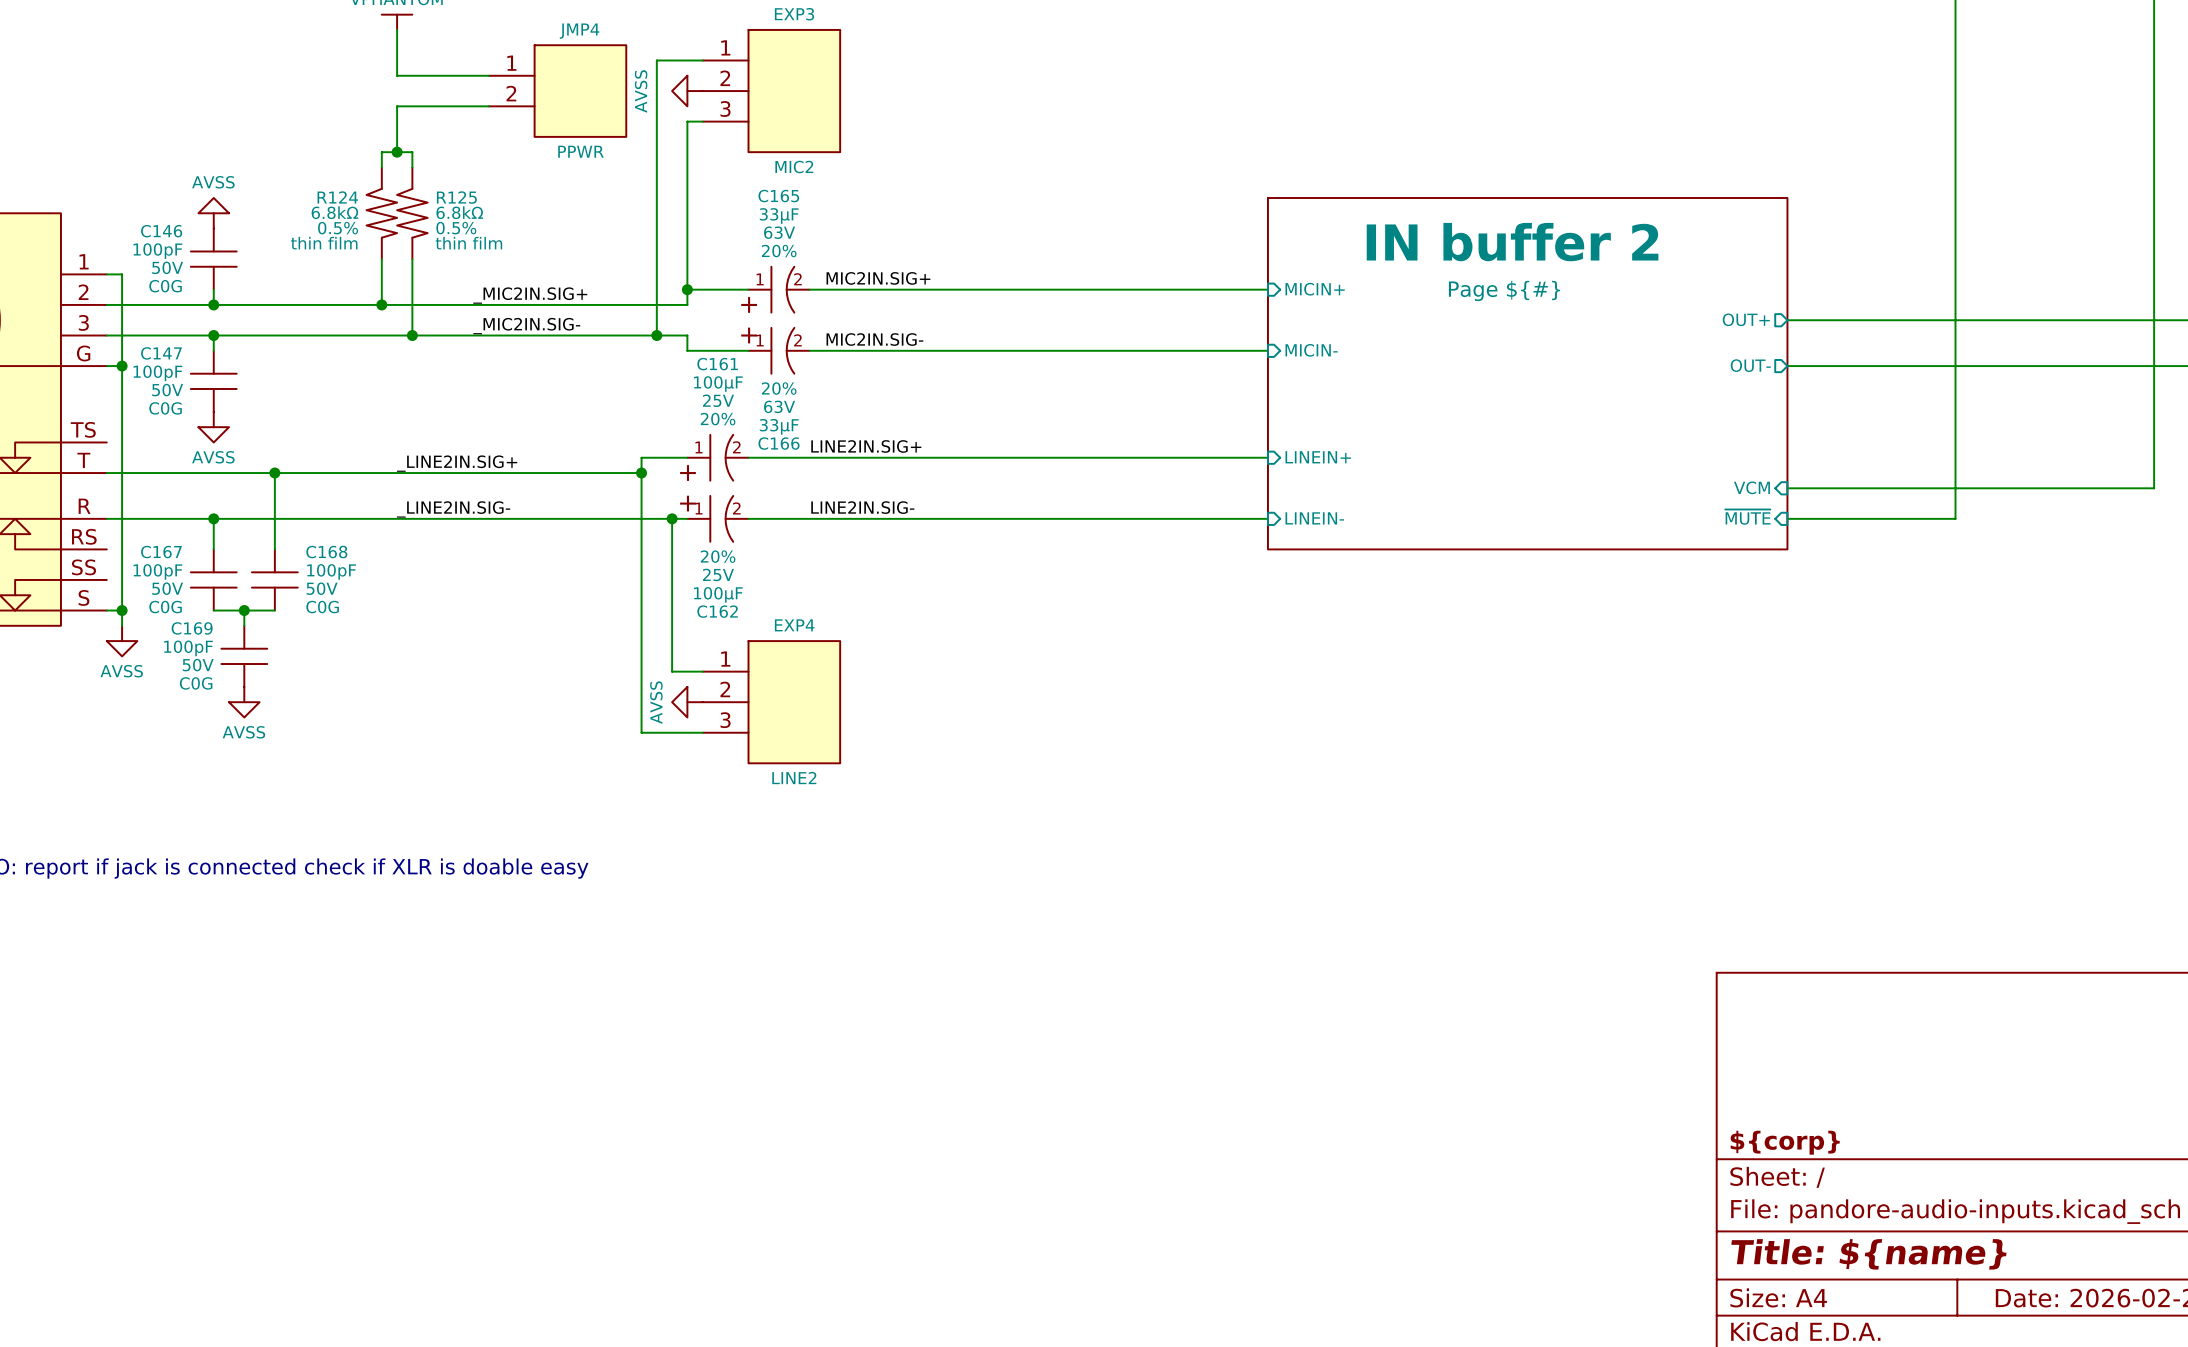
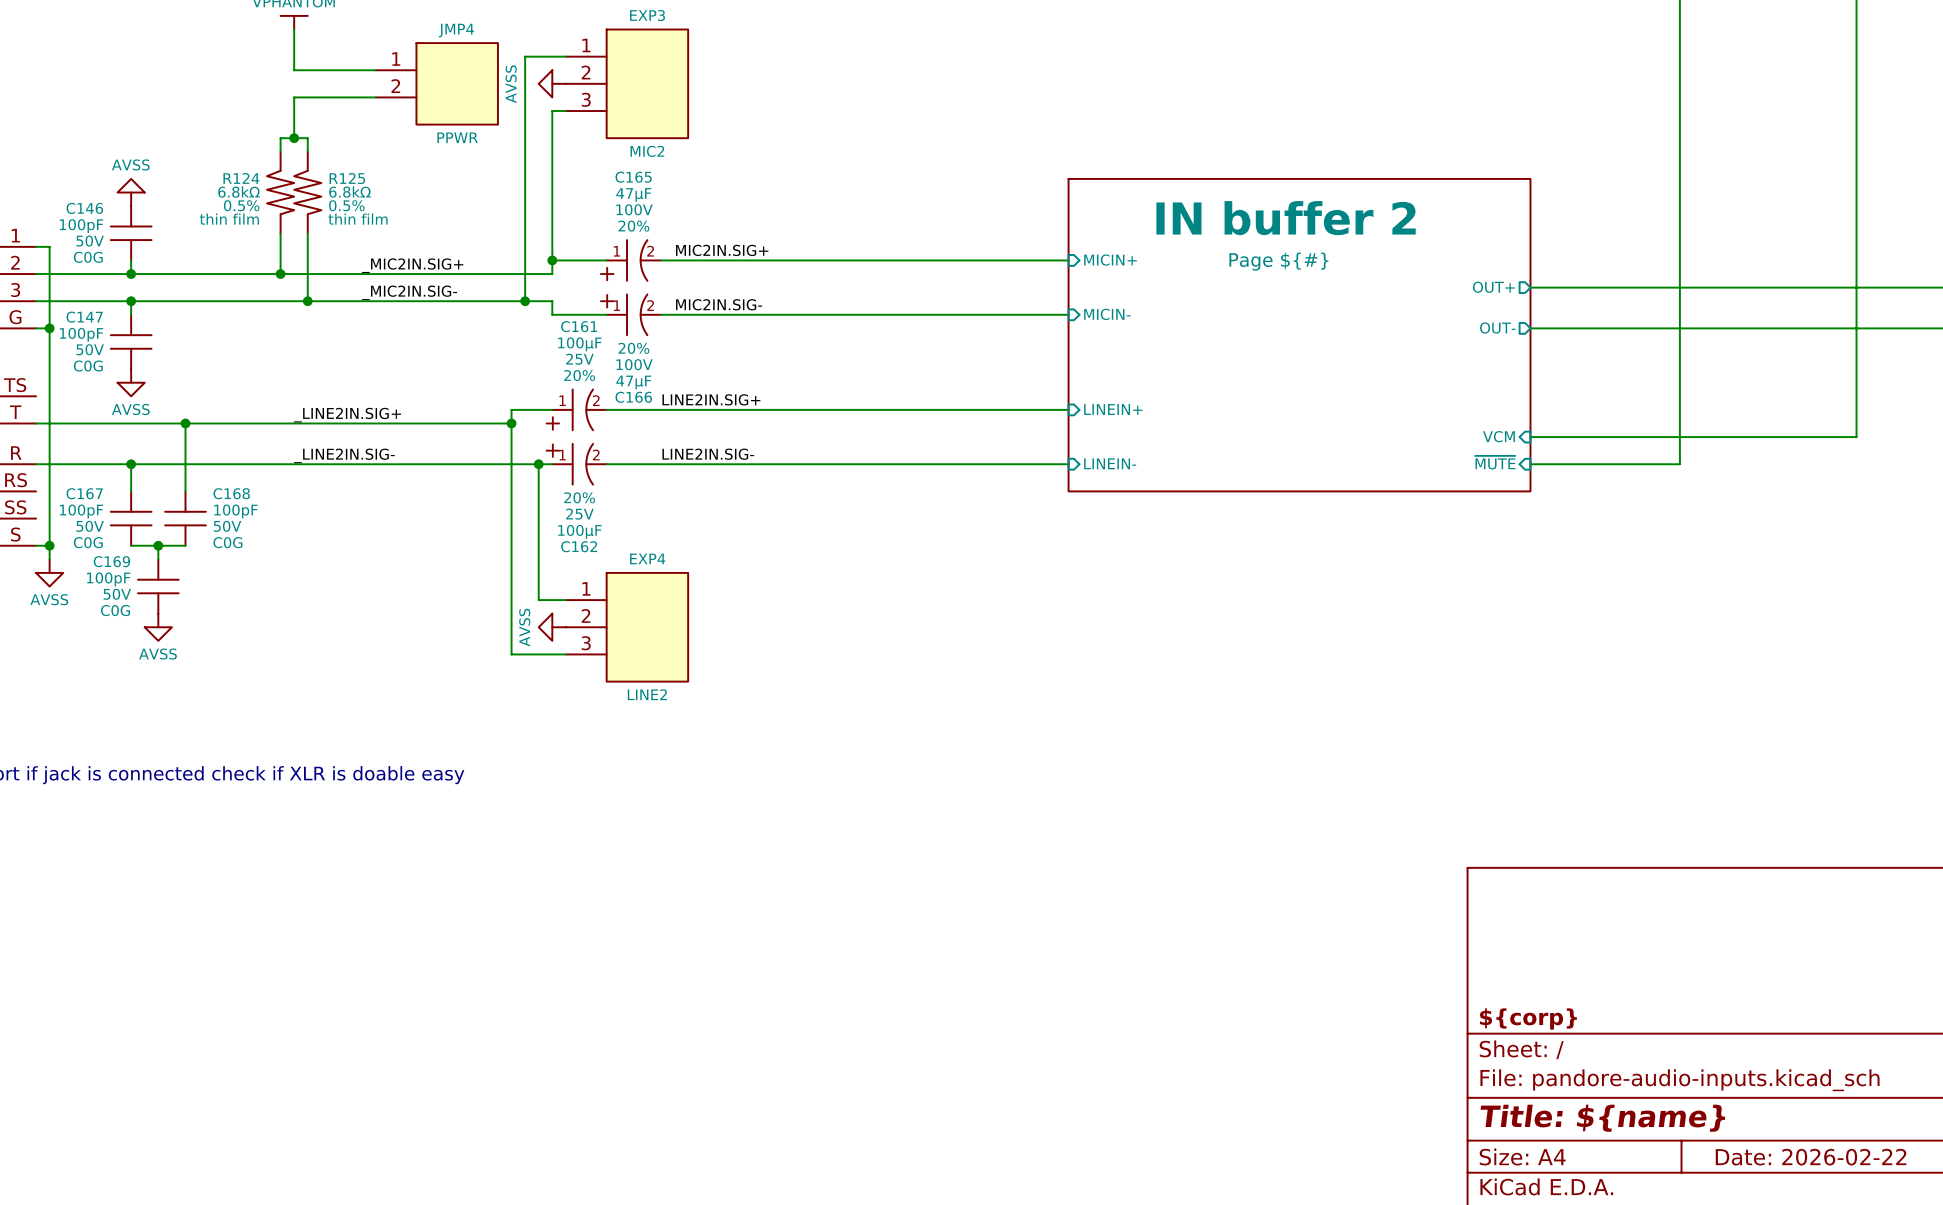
C165 text: 33µF (779, 215) -> 47µF (633, 195)
C165 text: 63V (779, 232) -> 100V (634, 209)
C166 text: 63V (779, 406) -> 100V (634, 364)
C166 text: 33µF (779, 426) -> 47µF (633, 382)

